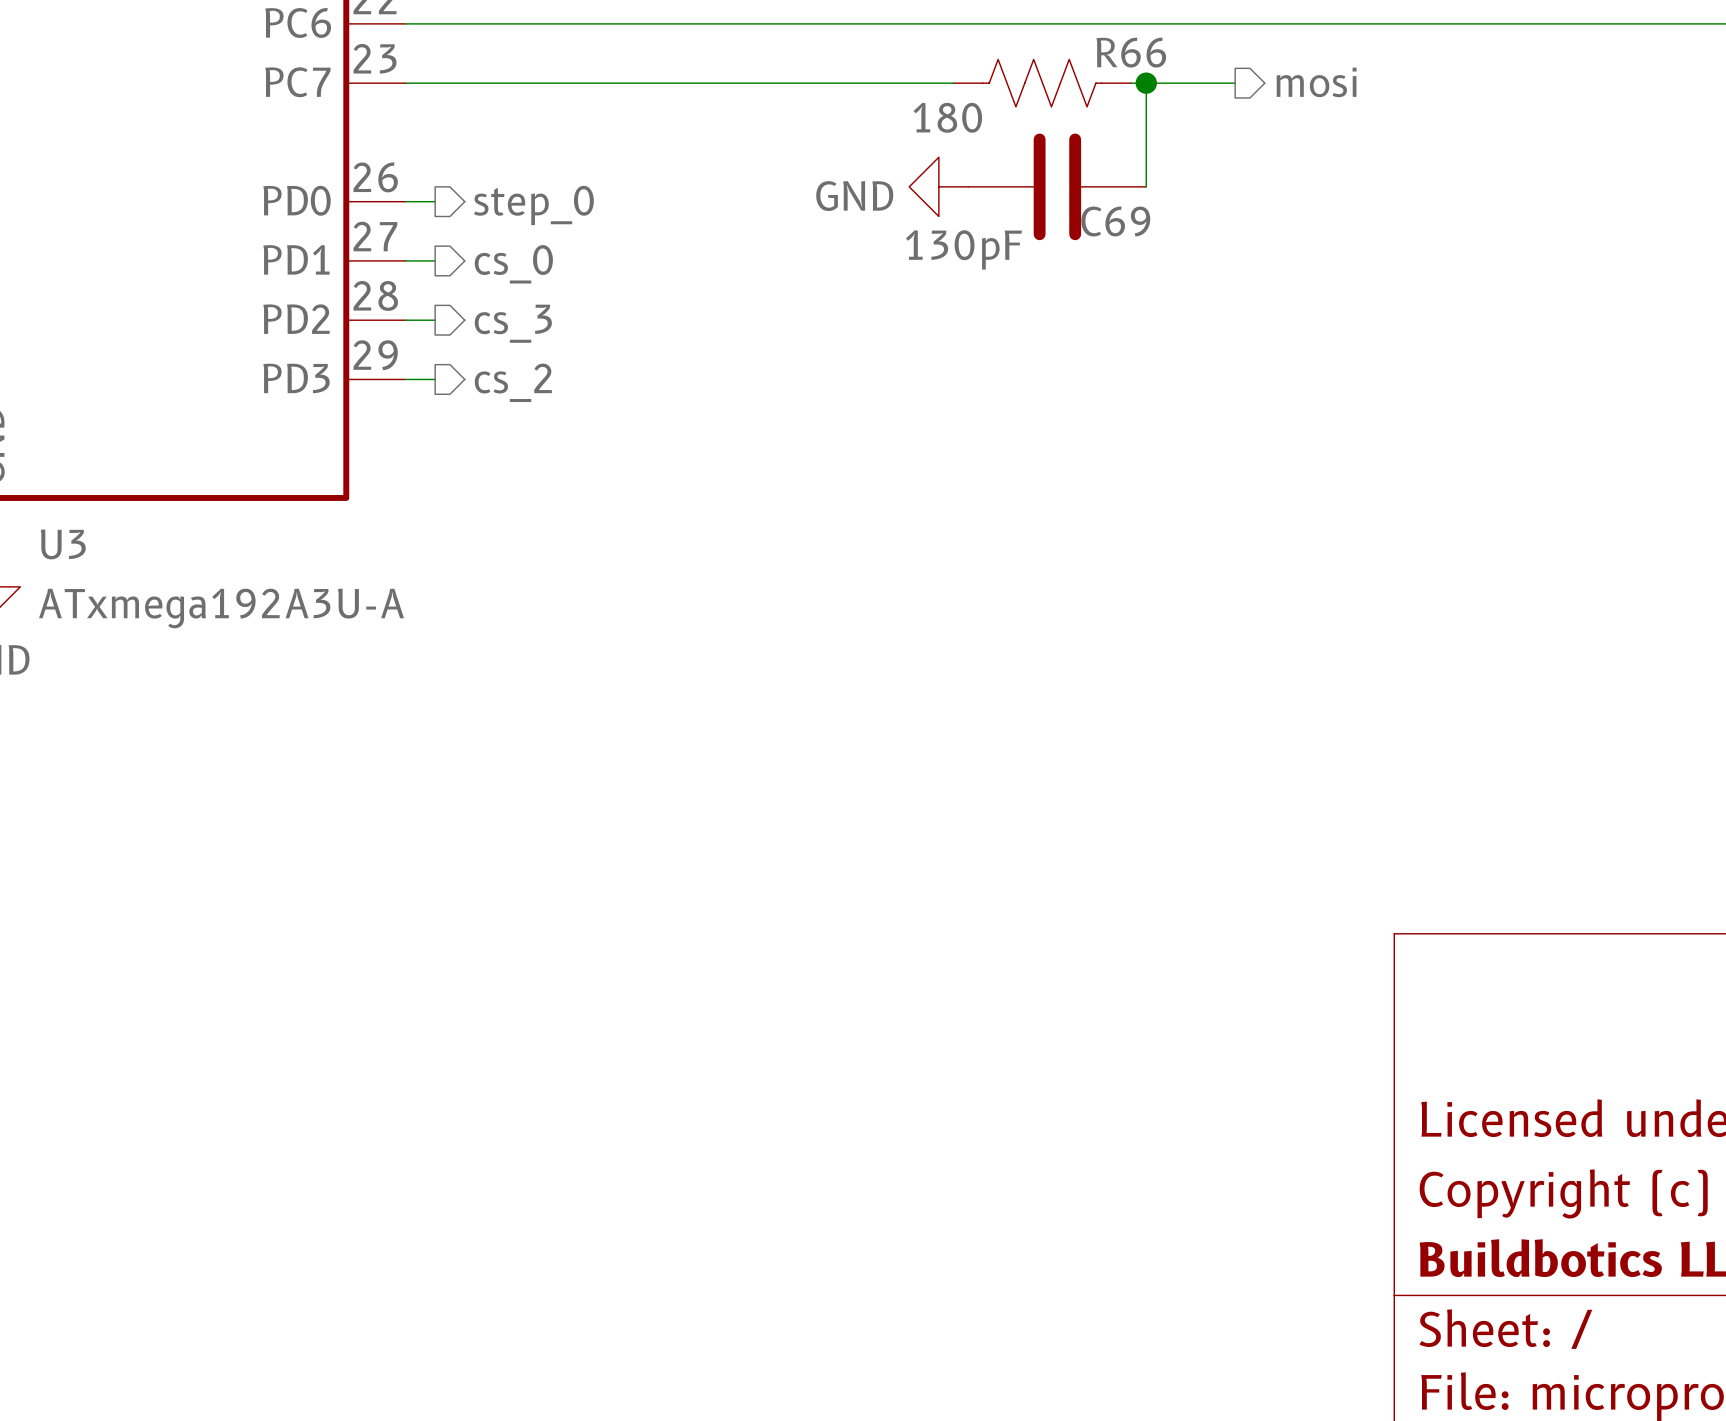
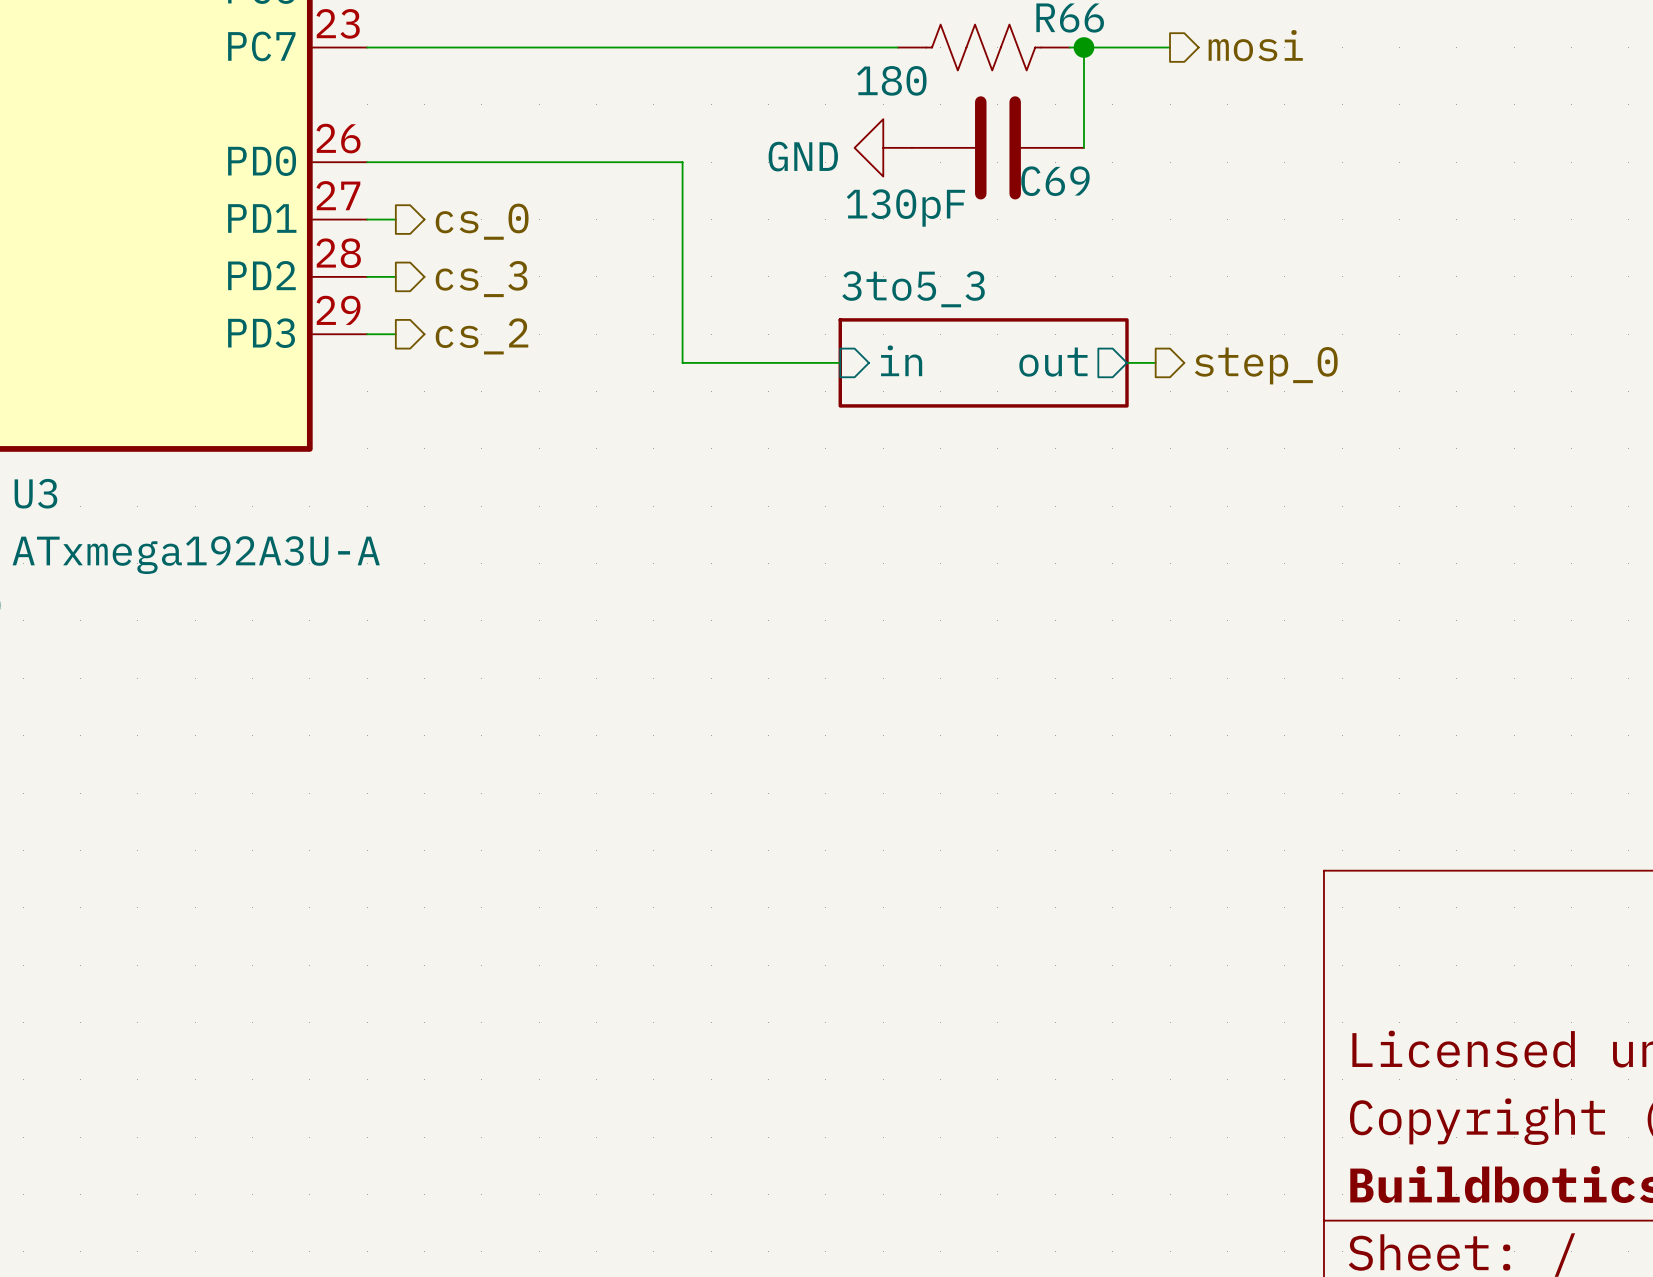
wire: none -> (395, 162) (682, 162) (682, 362) (840, 362)
hierarchical label: step_0 (533, 205) -> none
sheet pin: none -> in (901, 360)
sheet 3to5_3: none -> (983, 362)
sheet pin: none -> out (1053, 362)
wire: none -> (1127, 362) (1155, 362)
hierarchical label: none -> step_0 (1266, 365)

